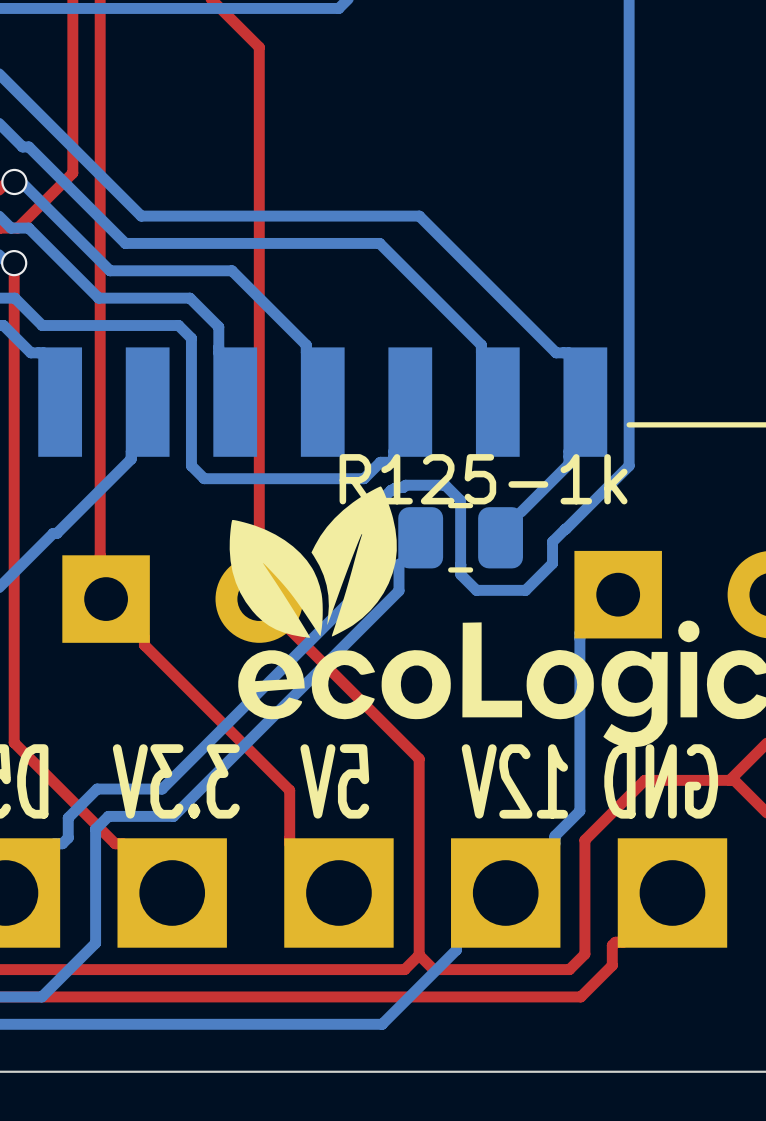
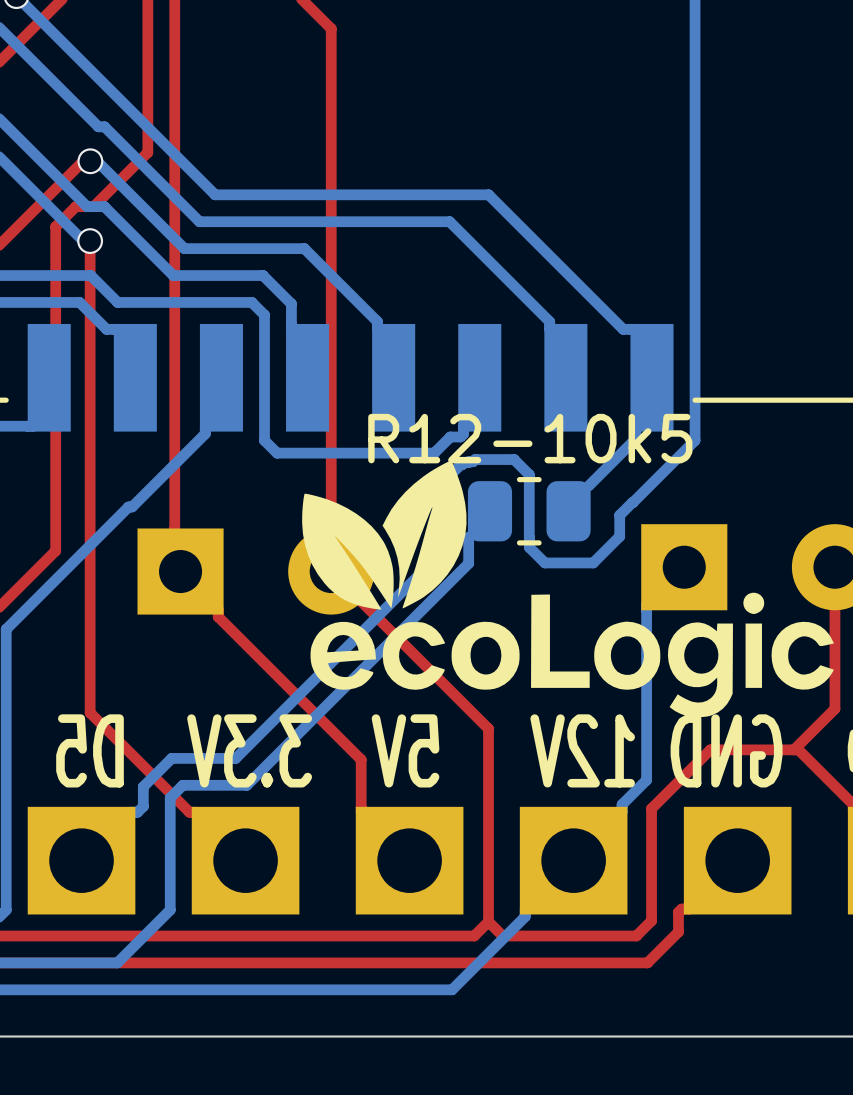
R125-1k name: R125-1k (483, 479) -> R12-10k5 (530, 438)

